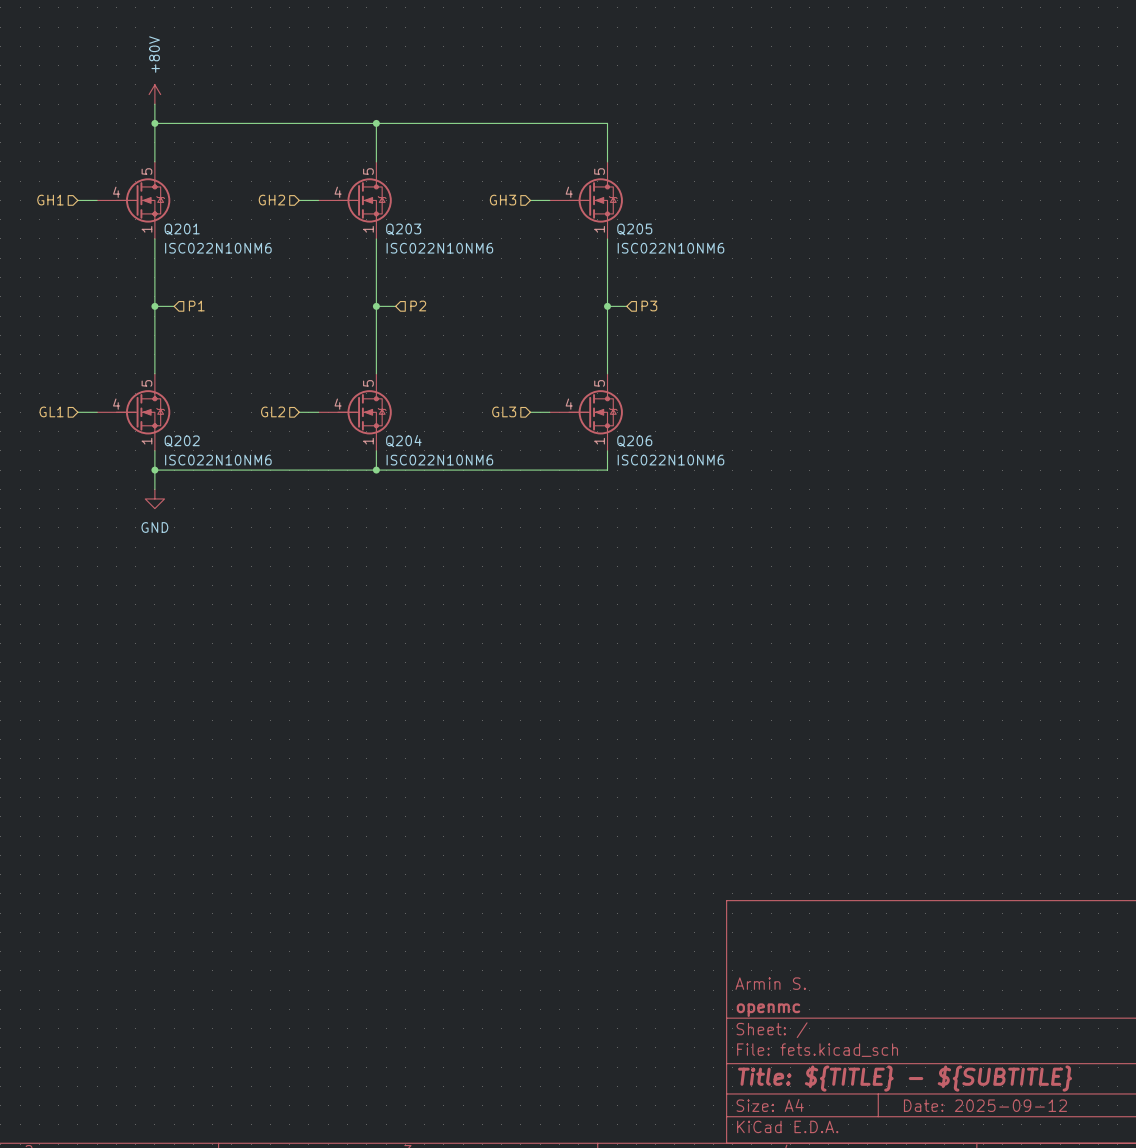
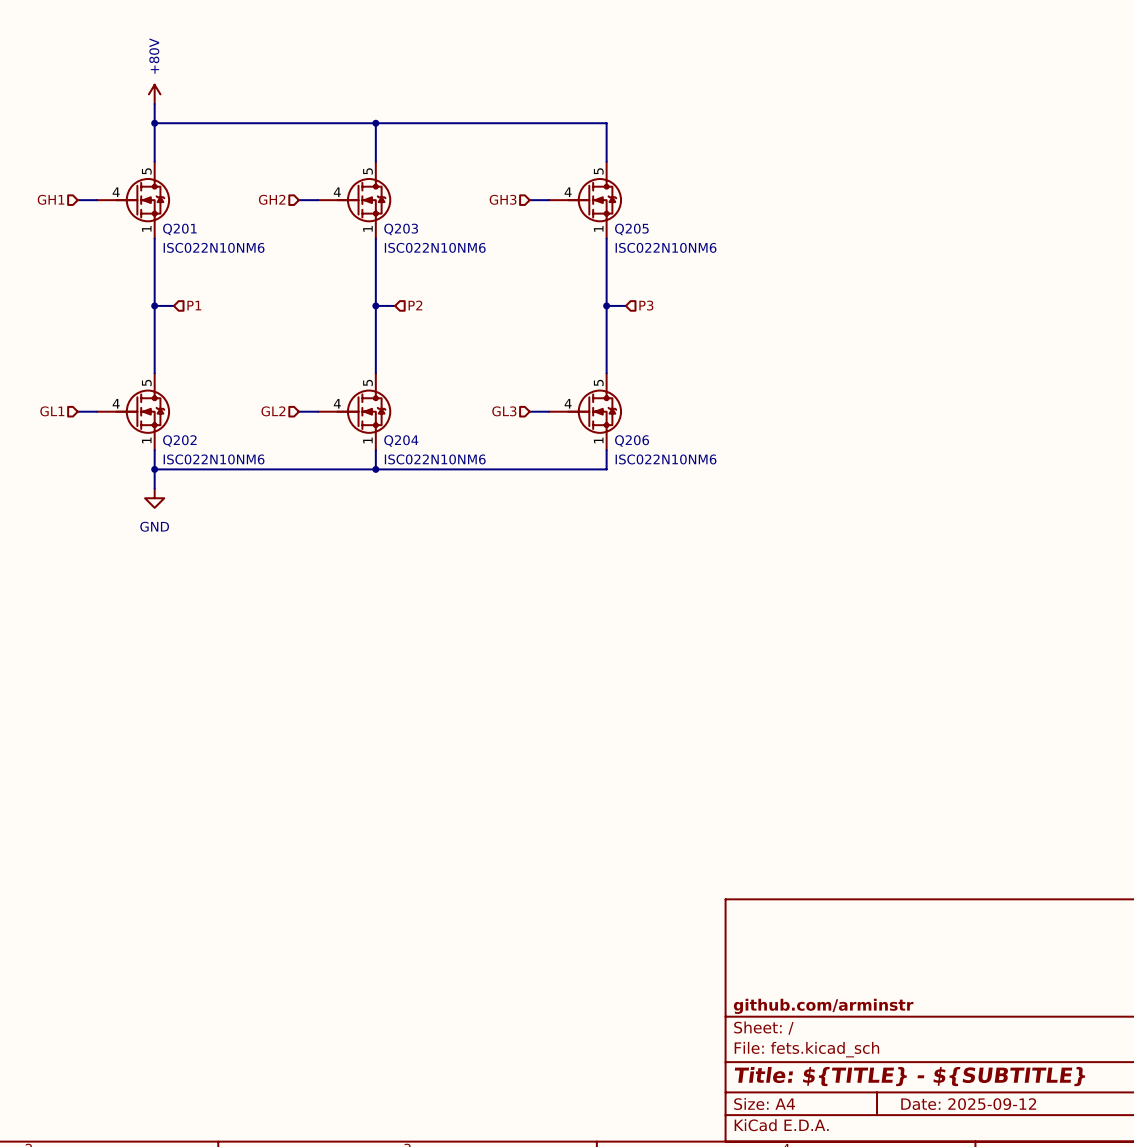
title block: Armin S. (770, 983) -> none
title block: openmc (768, 1010) -> github.com/arminstr (823, 1006)

